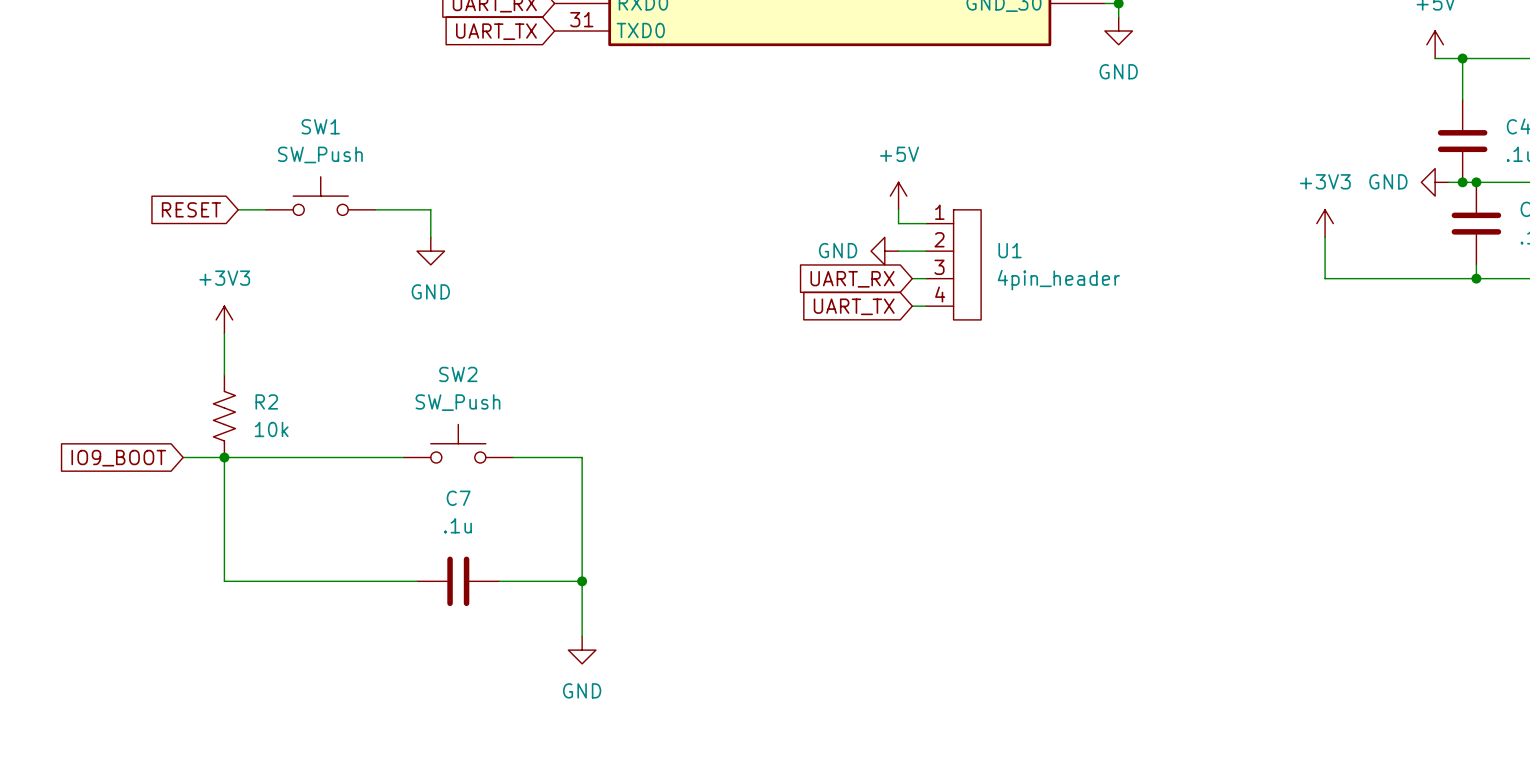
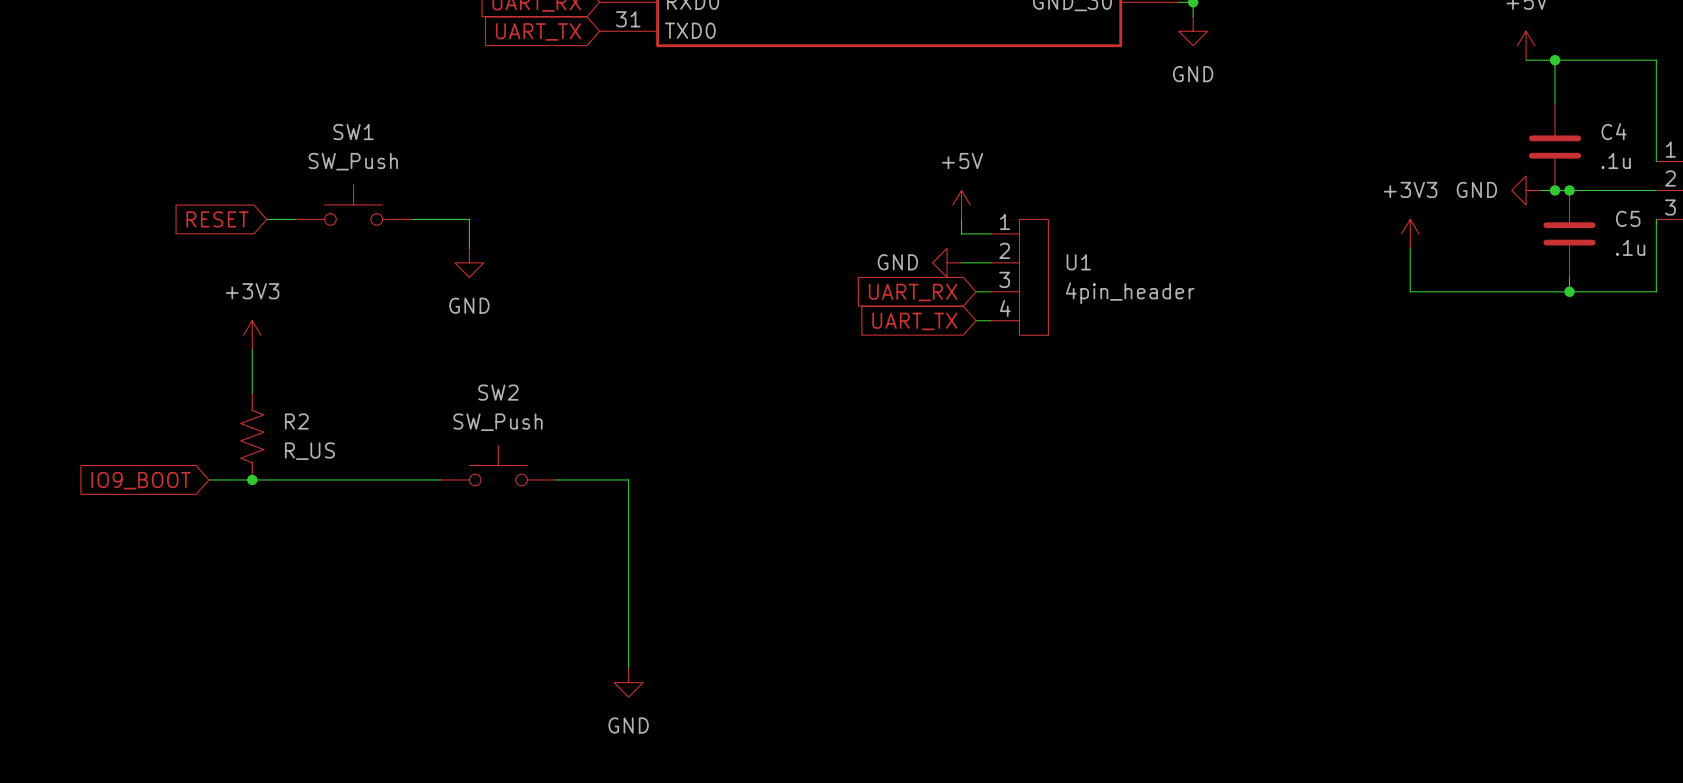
R2 value: 10k (271, 429) -> R_US (309, 451)
wire: (224, 457) (224, 581) (417, 581) -> none
C7: .1u (458, 581) -> none
wire: (499, 581) (582, 581) -> none
junction: (582, 581) -> none

